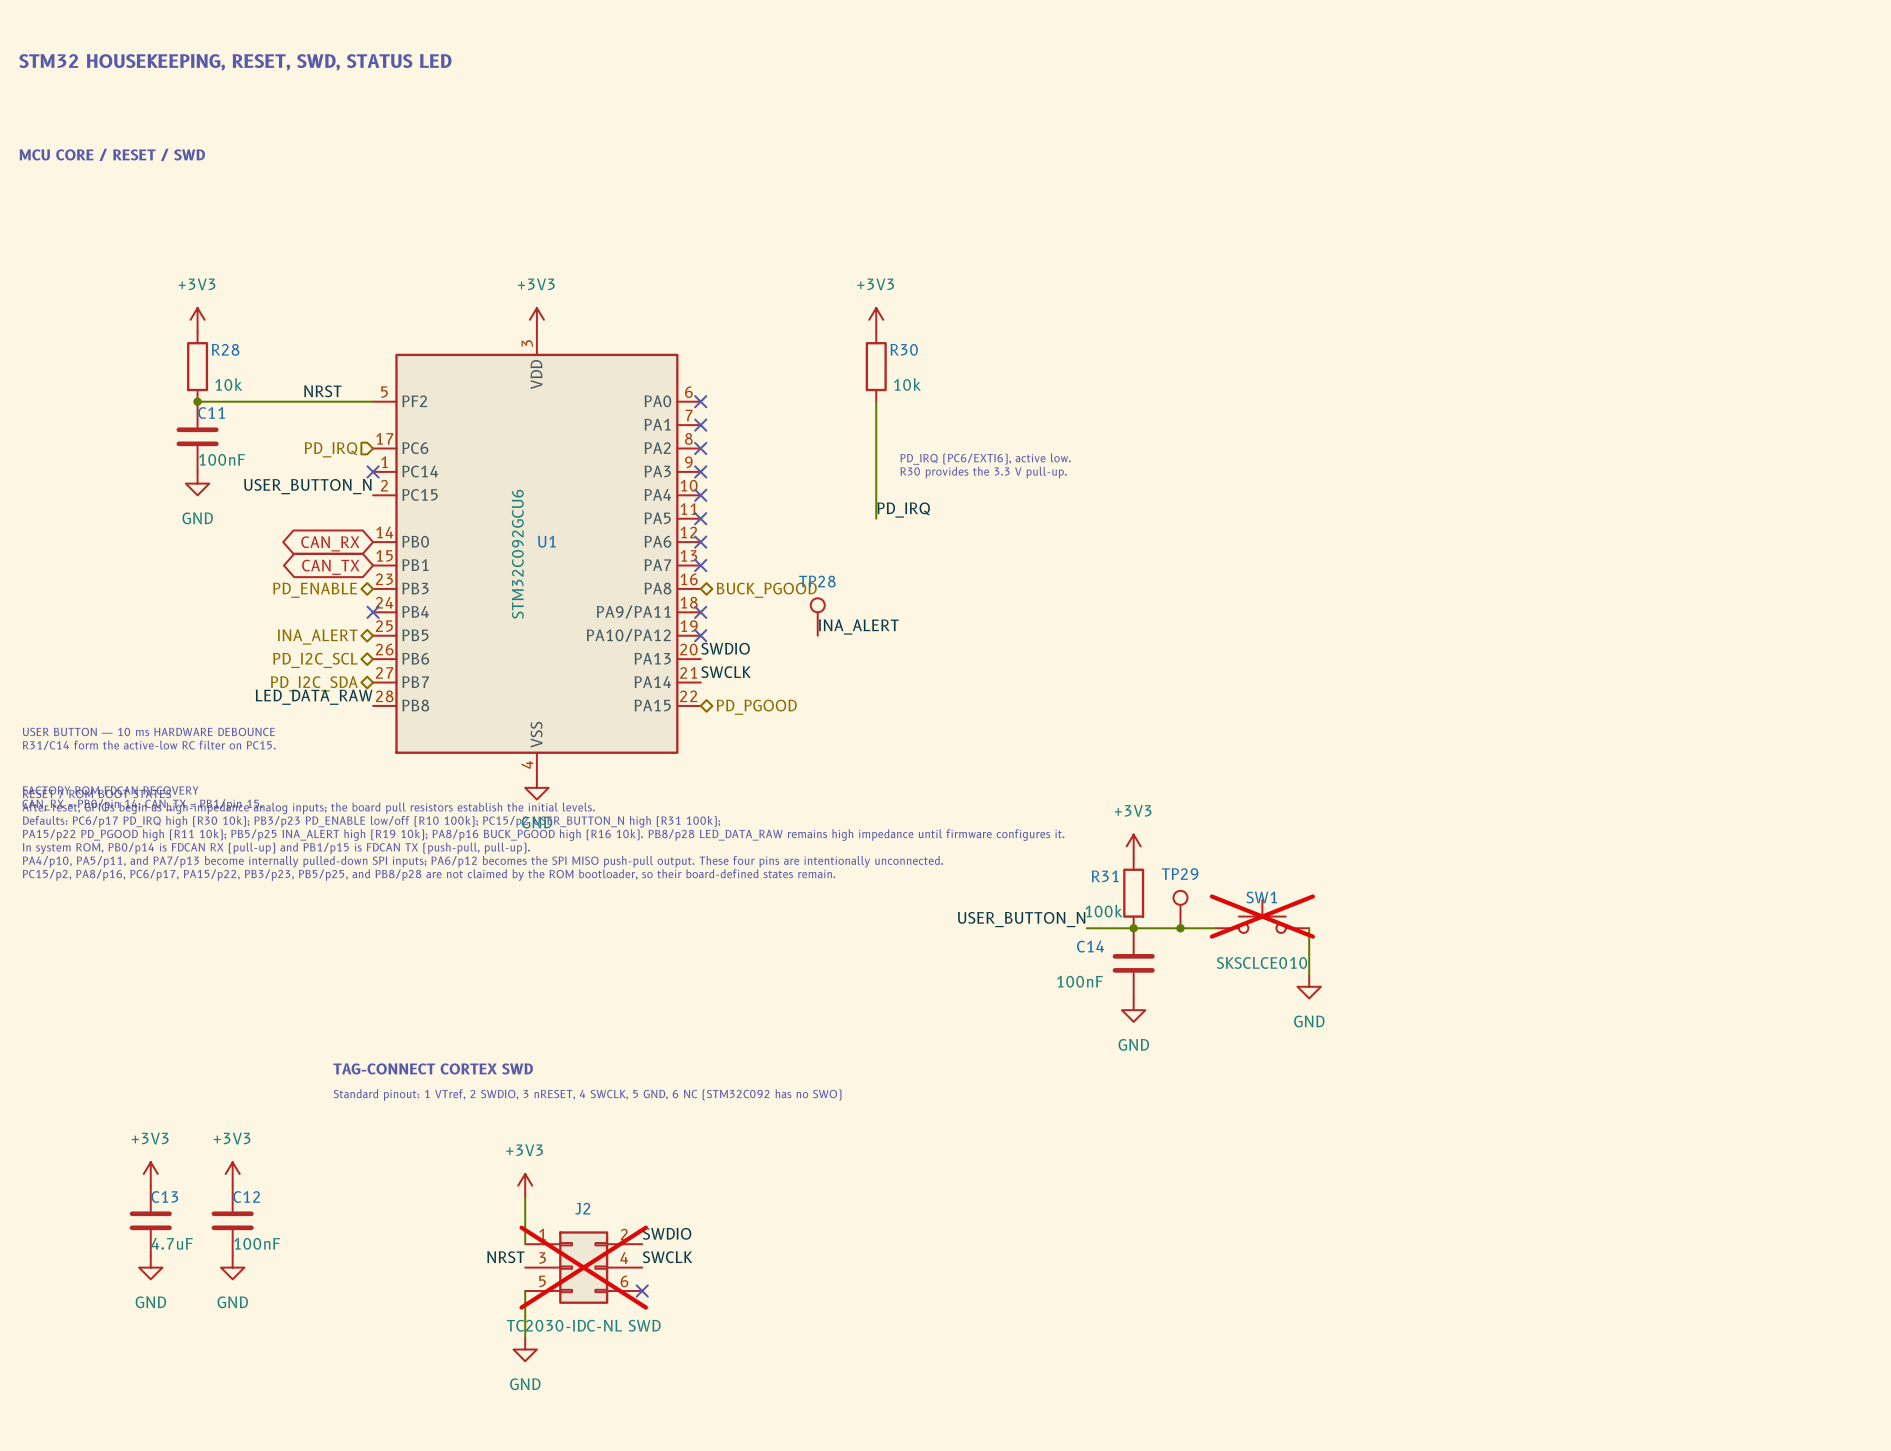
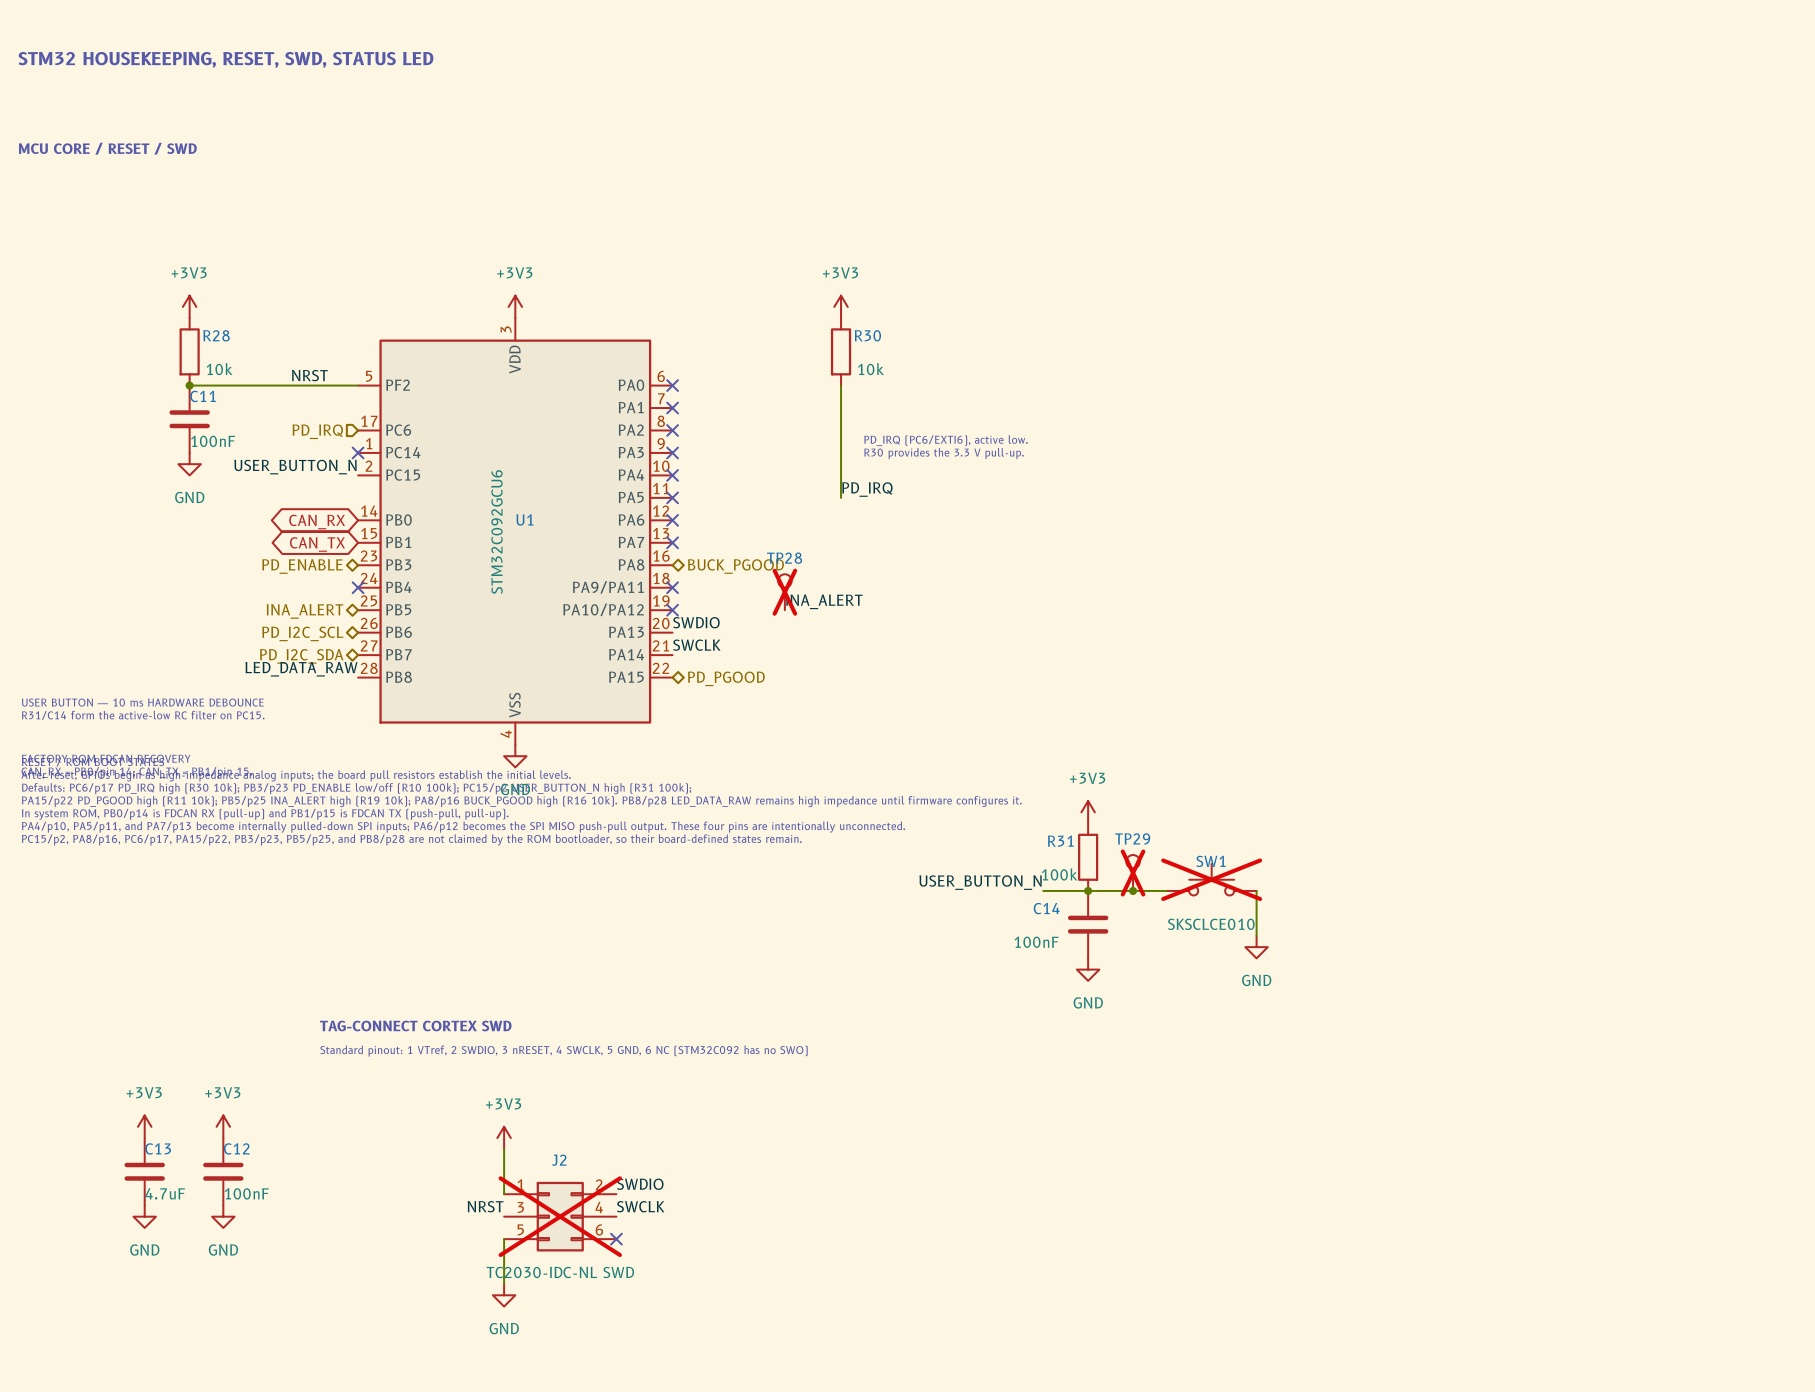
TP28 do-not-place cross: none -> (784, 592)
TP29 do-not-place cross: none -> (1133, 873)

